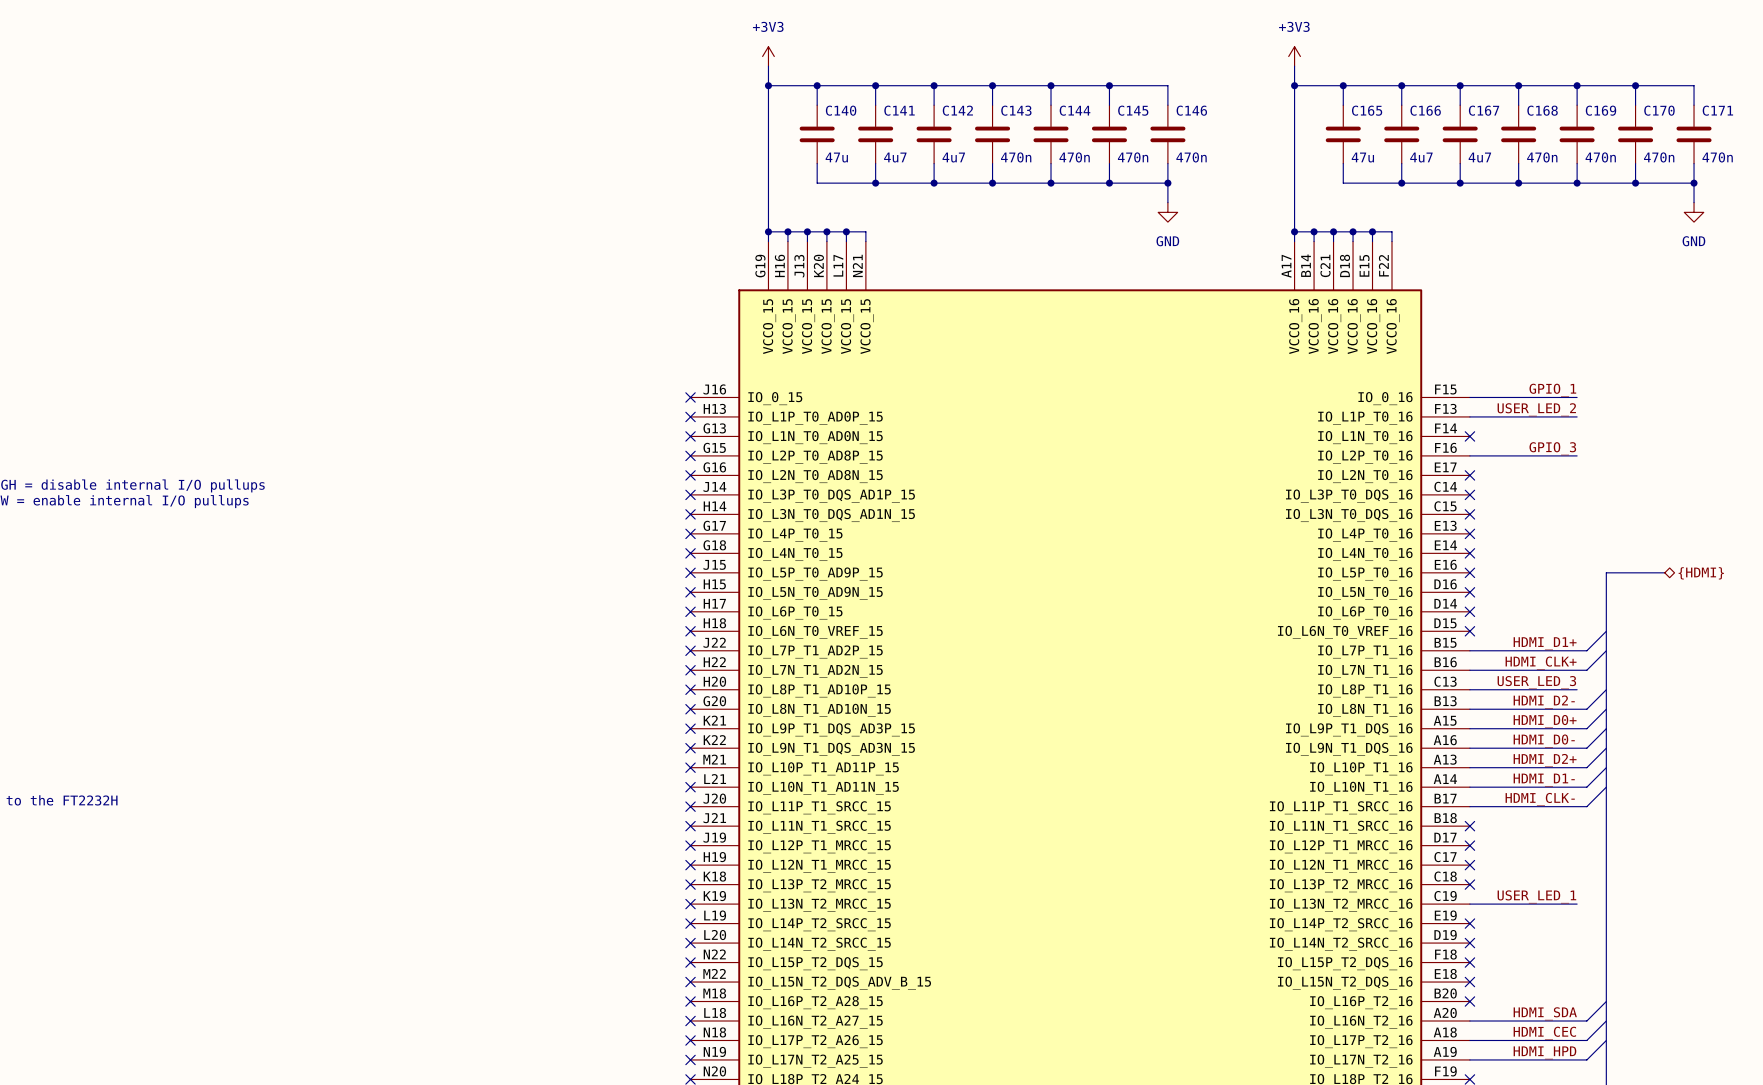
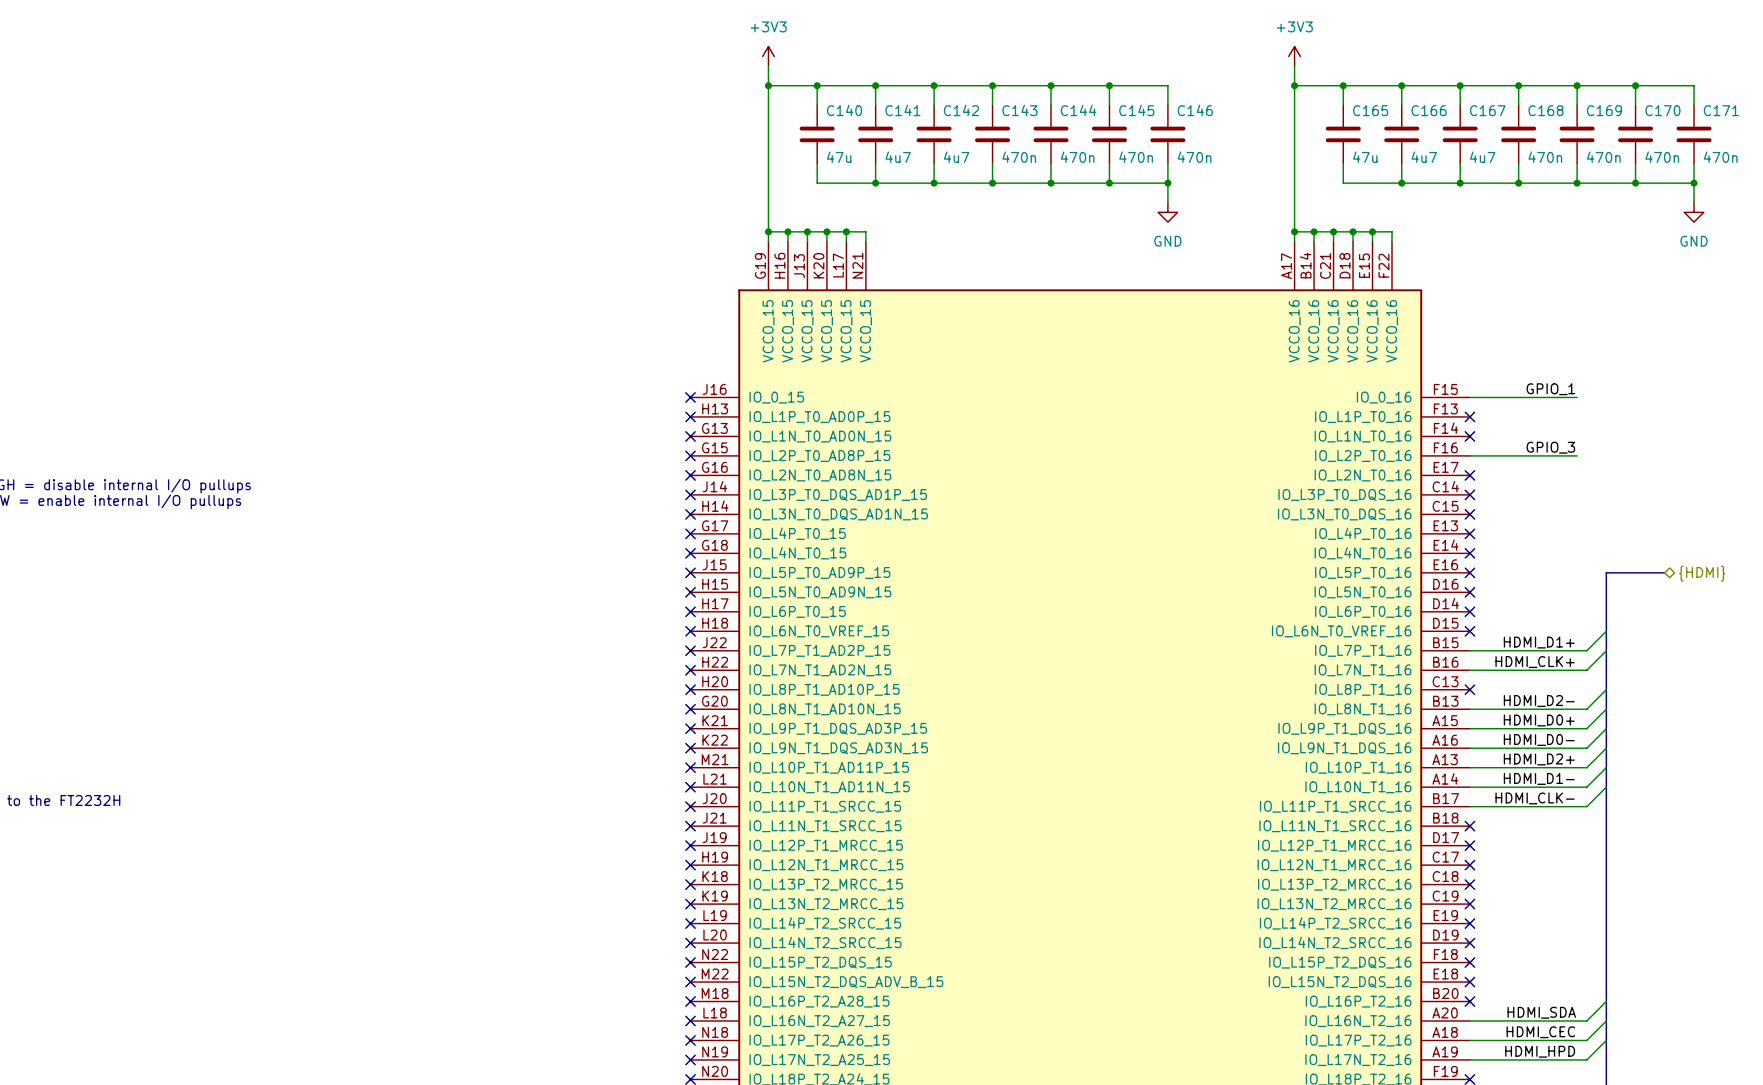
label: USER_LED_2 (1536, 409) -> none
wire: (1469, 416) (1577, 416) -> none
no-connect mark: none -> (1469, 416)
label: USER_LED_3 (1536, 682) -> none
wire: (1469, 689) (1577, 689) -> none
no-connect mark: none -> (1469, 689)
label: USER_LED_1 (1536, 896) -> none
wire: (1469, 904) (1577, 904) -> none
no-connect mark: none -> (1469, 904)

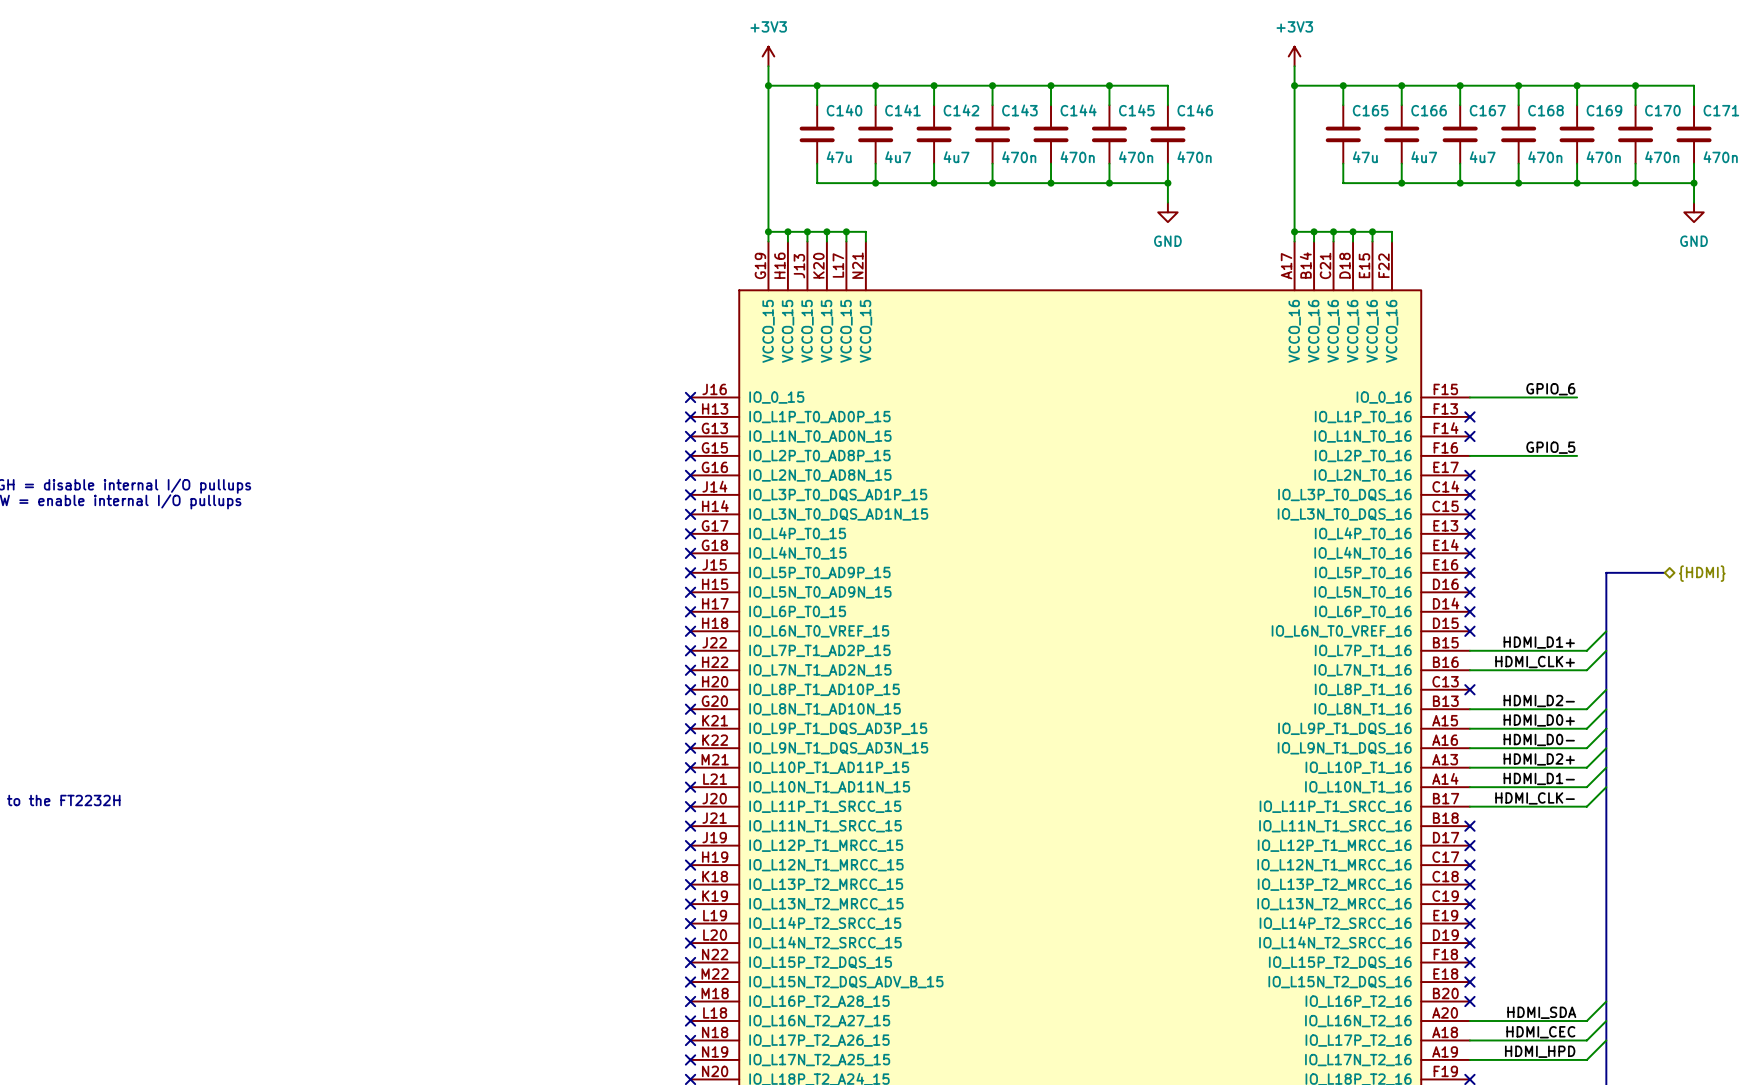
label: GPIO_1 (1550, 389) -> GPIO_6 (1550, 389)
label: GPIO_3 (1550, 447) -> GPIO_5 (1550, 447)

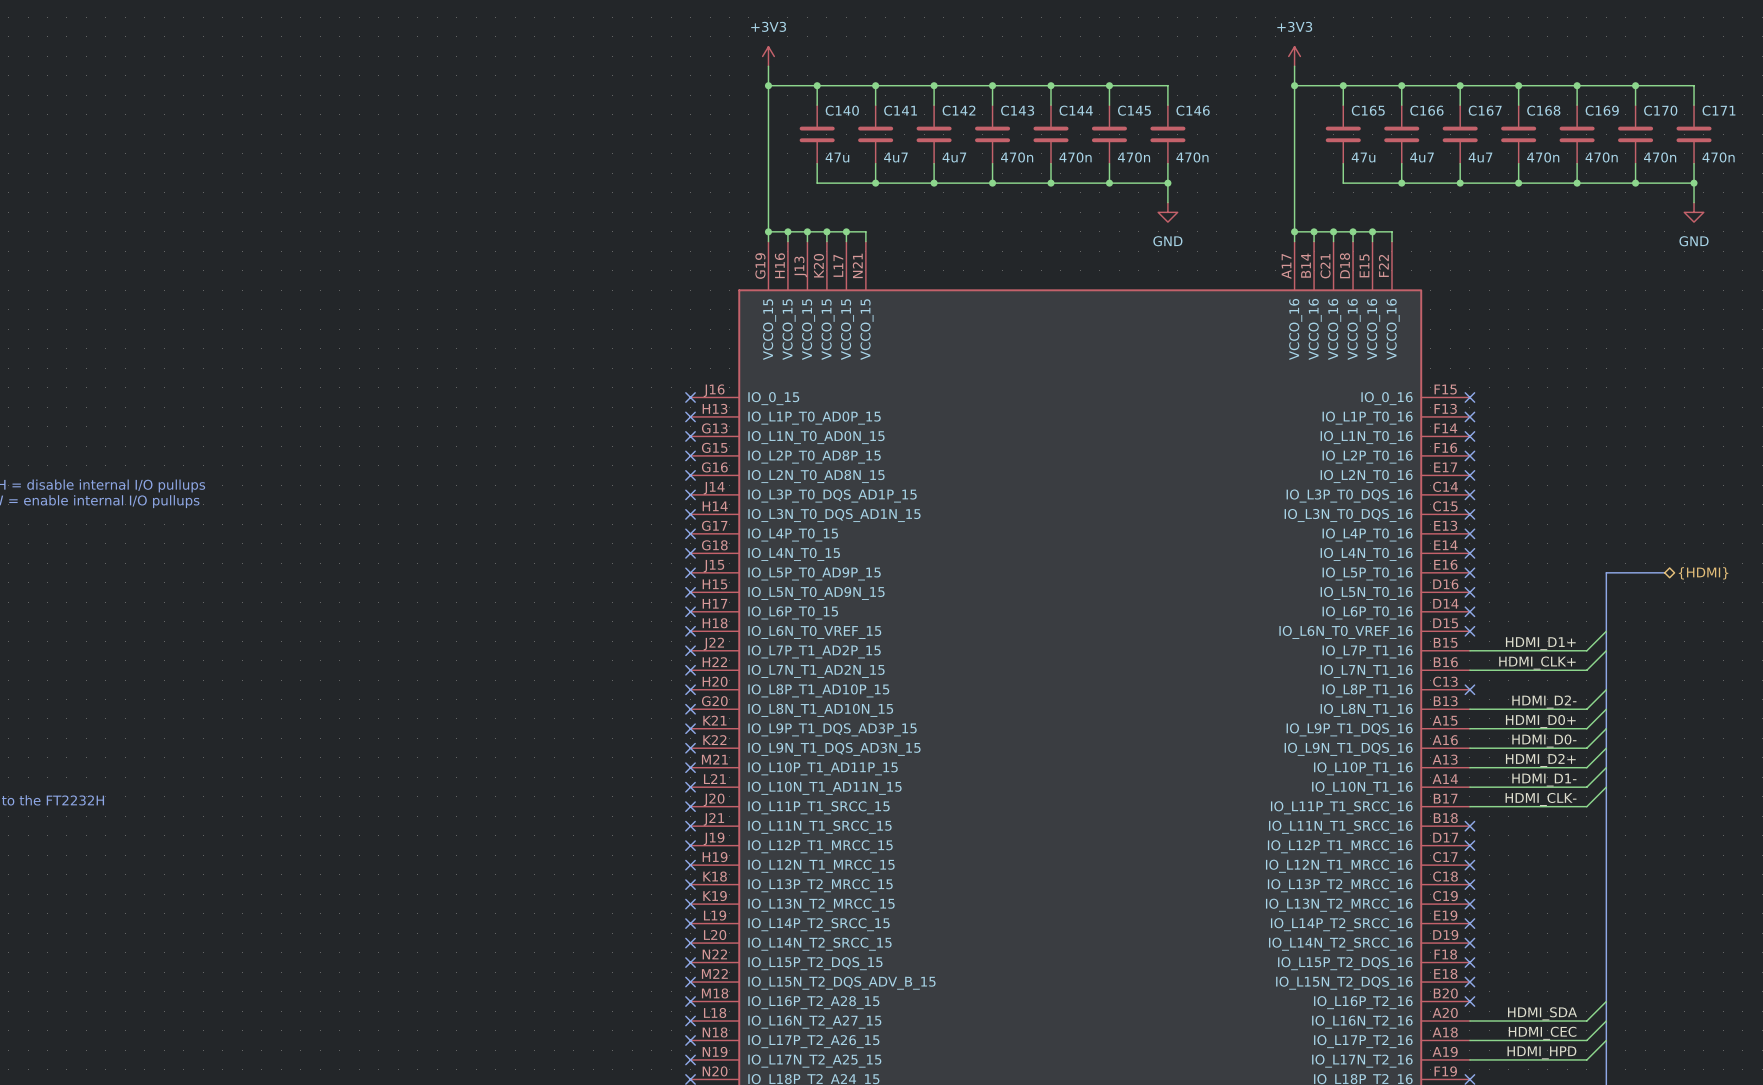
label: GPIO_6 (1550, 389) -> none
wire: (1469, 397) (1577, 397) -> none
no-connect mark: none -> (1469, 397)
label: GPIO_5 (1550, 447) -> none
wire: (1469, 455) (1577, 455) -> none
no-connect mark: none -> (1469, 455)

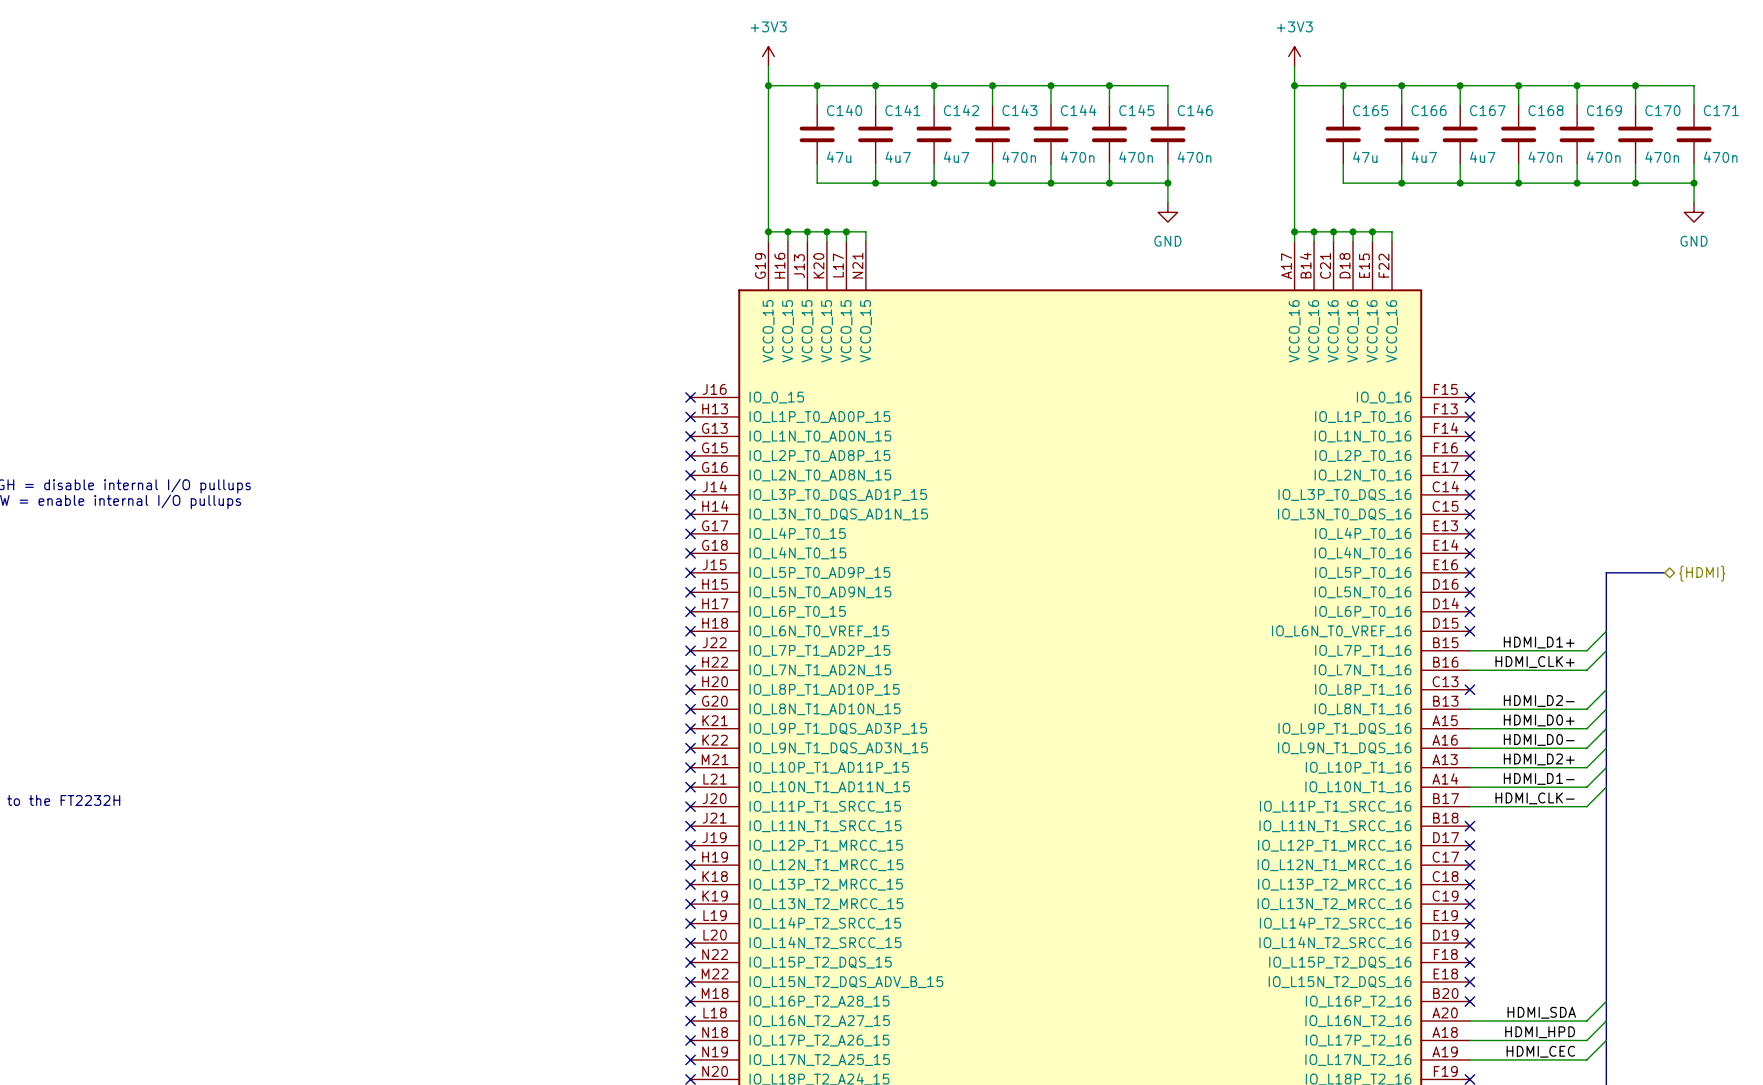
label: HDMI_CEC (1542, 1033) -> HDMI_HPD (1540, 1032)
label: HDMI_HPD (1541, 1052) -> HDMI_CEC (1540, 1051)

